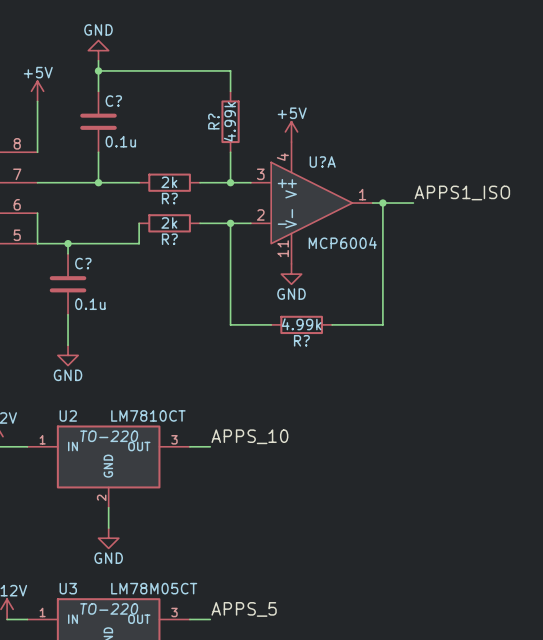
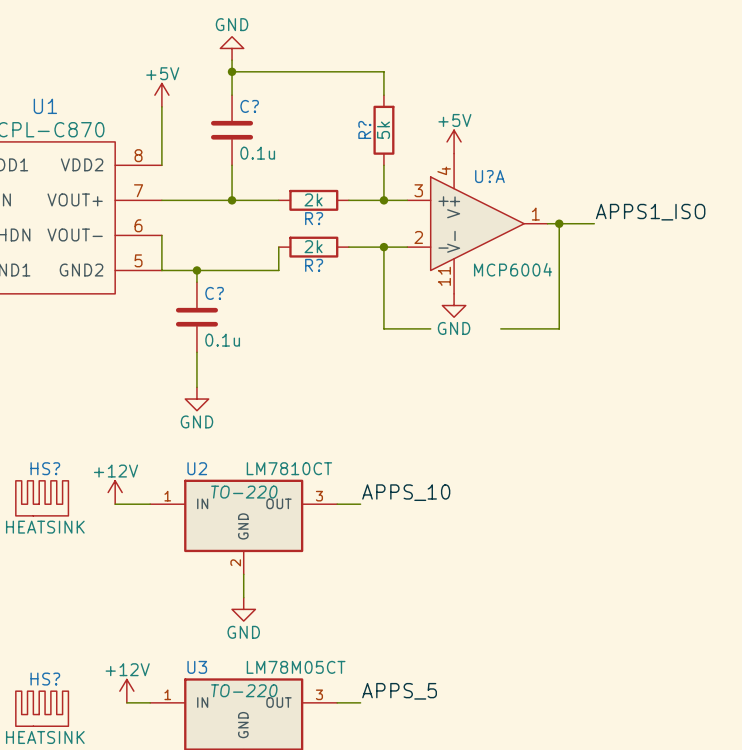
R? value: 4.99k (229, 121) -> 5k (383, 130)
wire: (230, 294) (230, 324) (271, 324) -> (383, 328) (430, 328)
wire: (382, 294) (382, 324) (332, 324) -> (559, 328) (500, 328)
R?: 4.99k (301, 324) -> none

